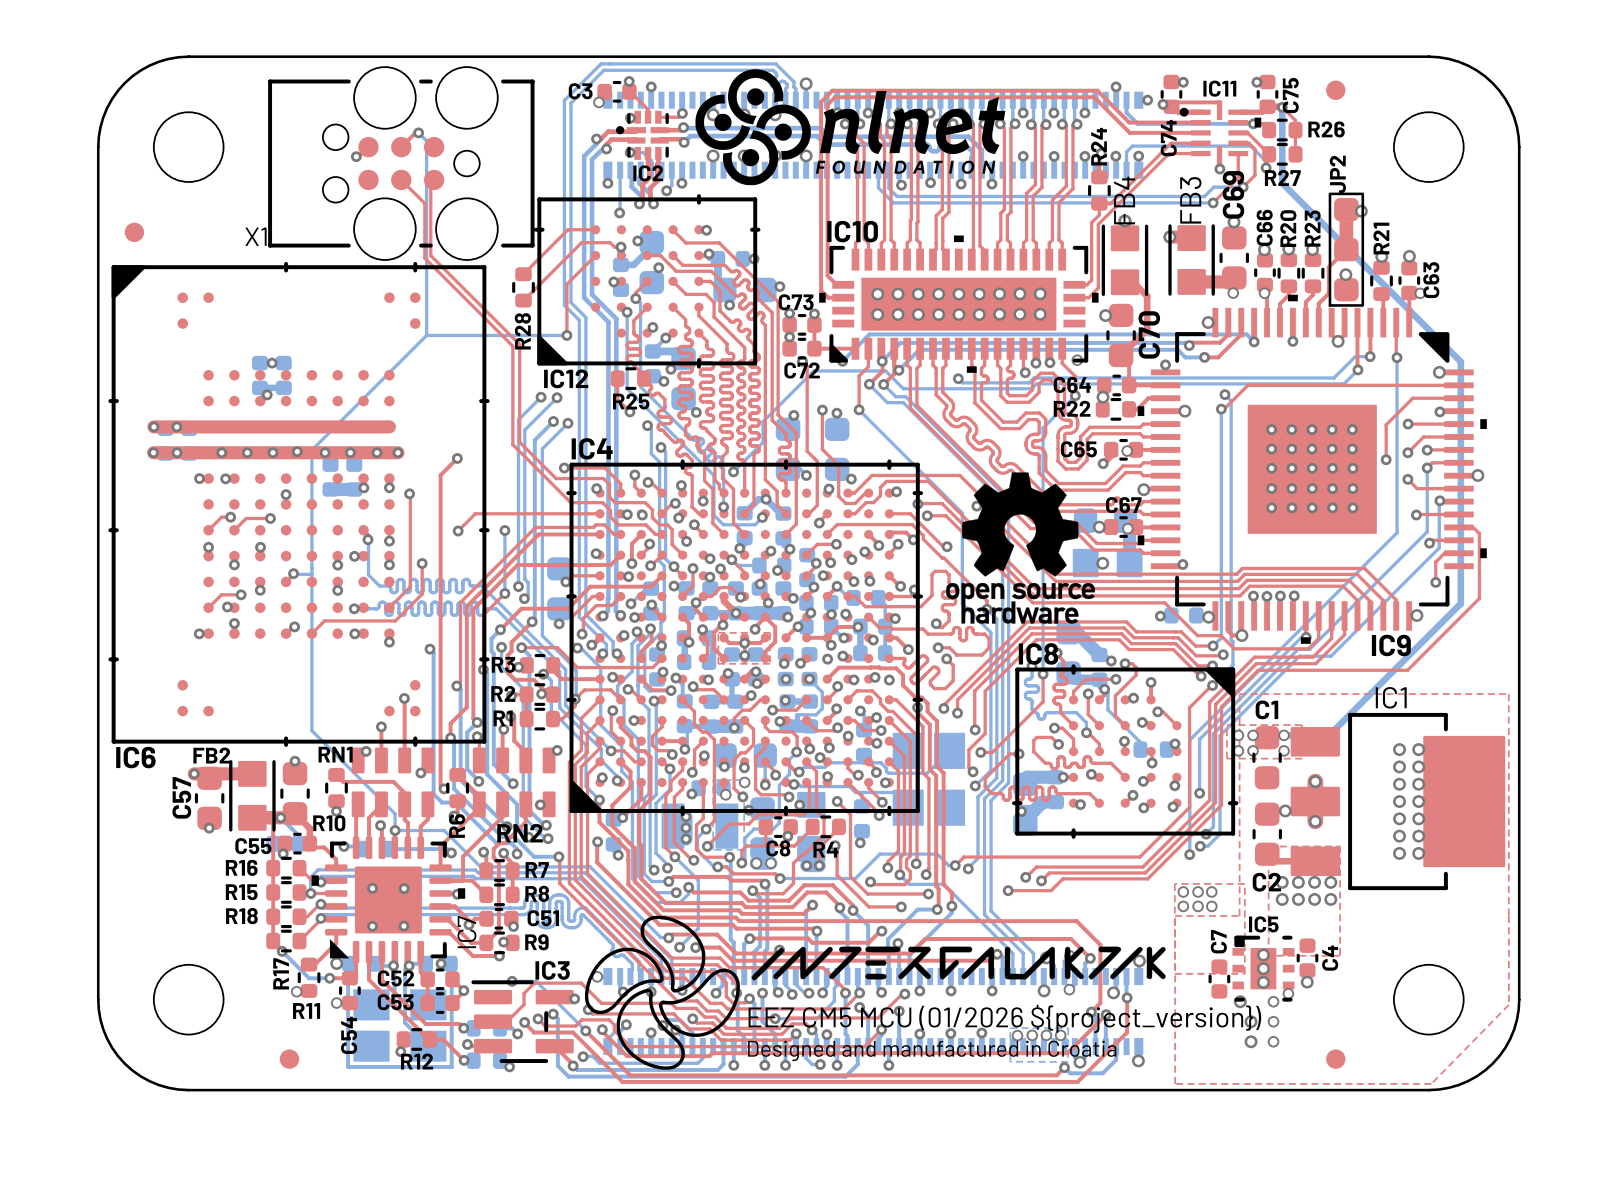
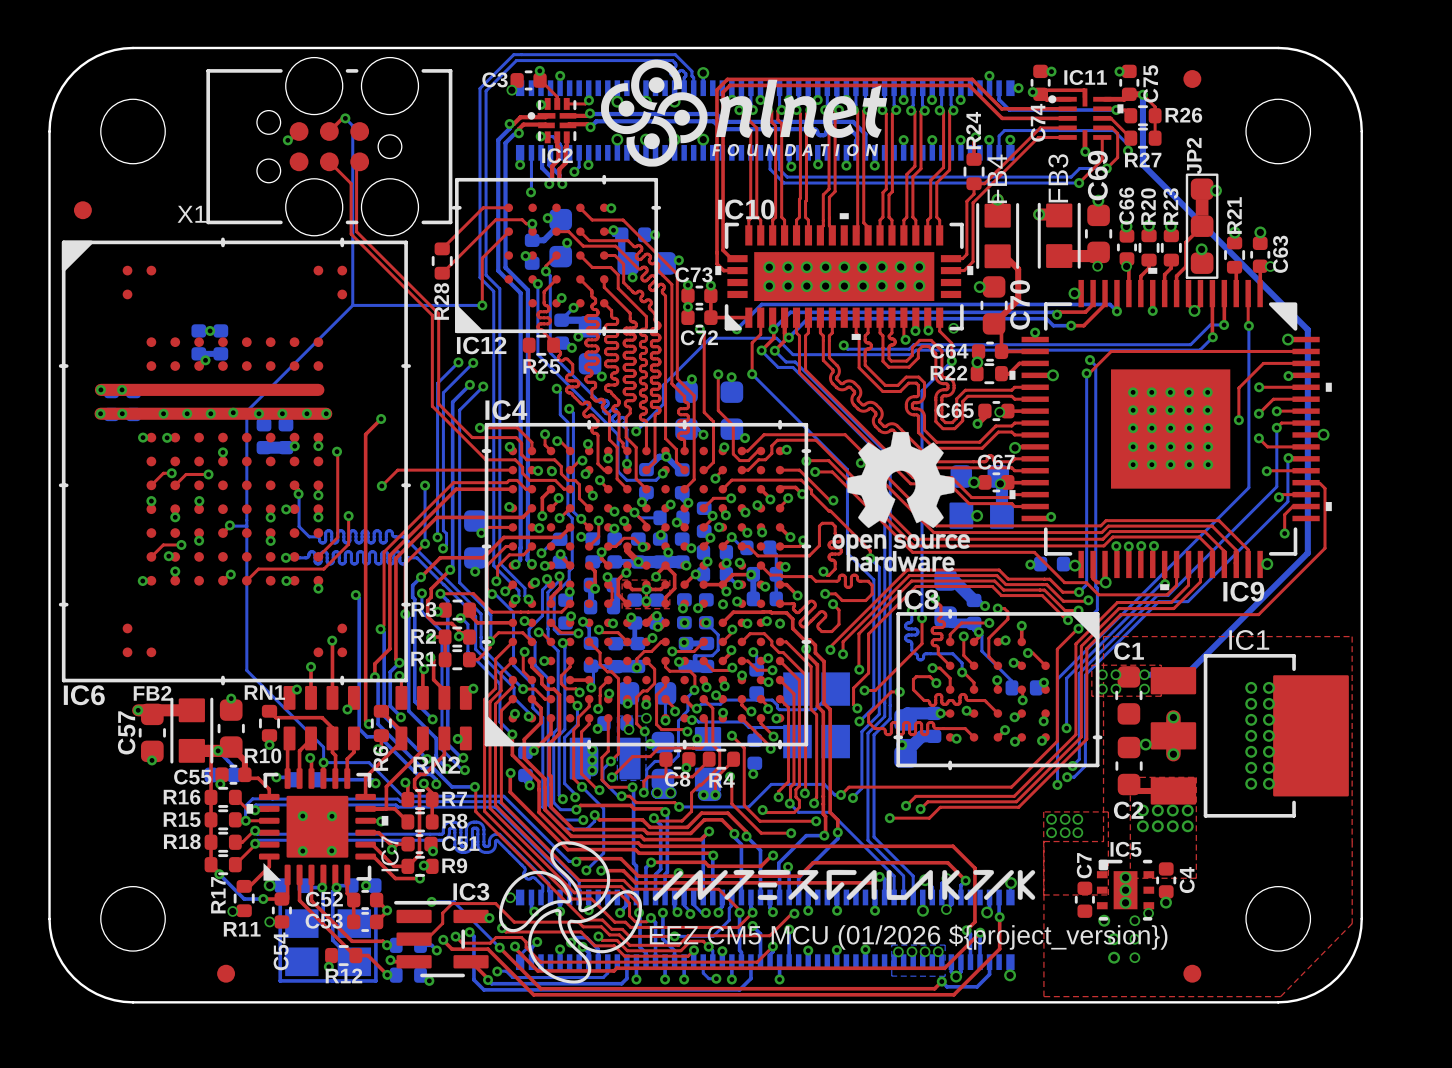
text: Designed and manufactured in Croatia (932, 1050) -> none

